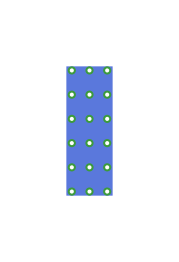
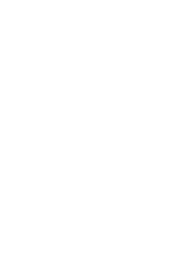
part: (89, 131) -> none

